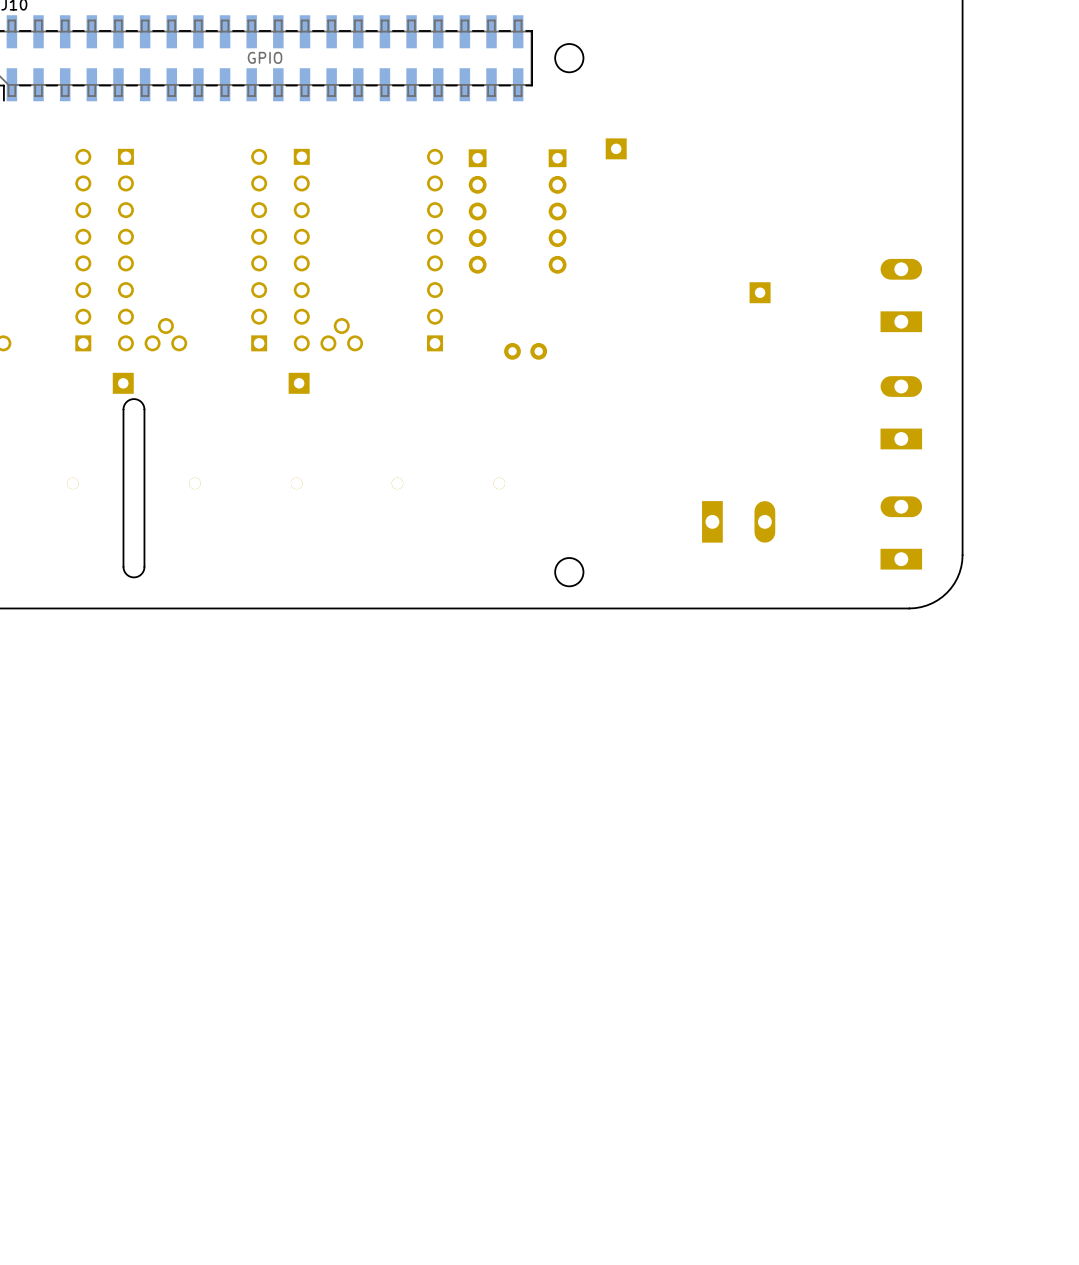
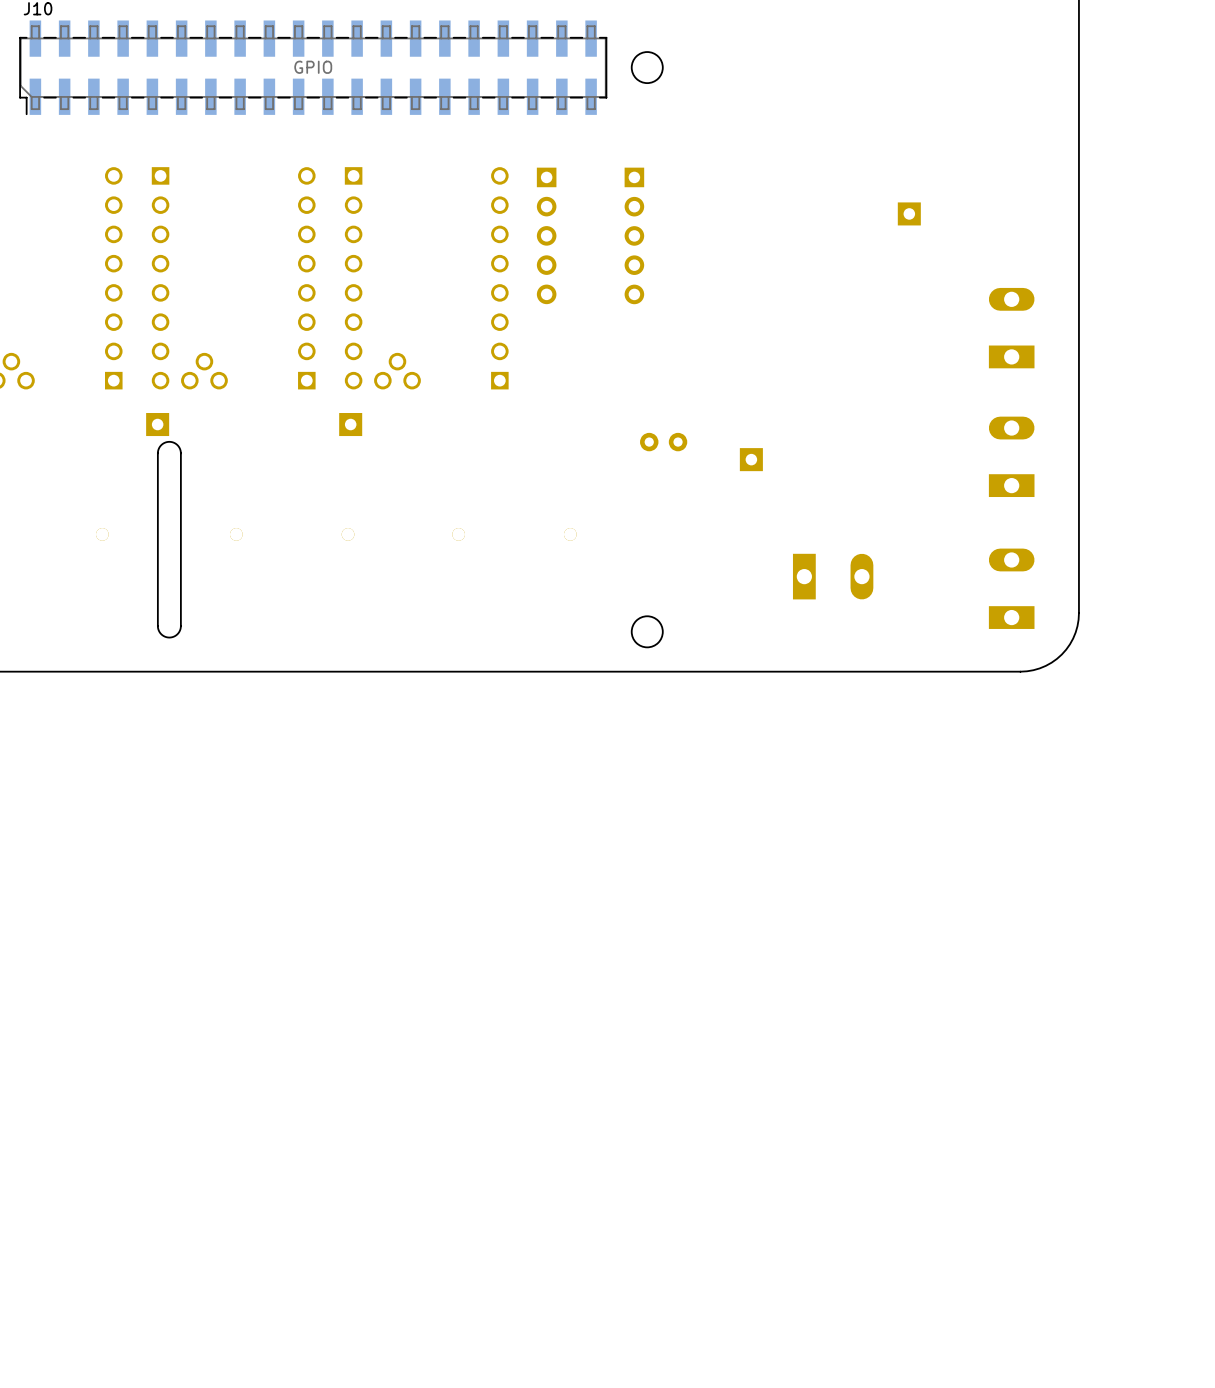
part: (616, 148) -> none
part: none -> (909, 213)
part: (760, 292) -> none
part position: (525, 351) -> (663, 442)
part: none -> (751, 459)

